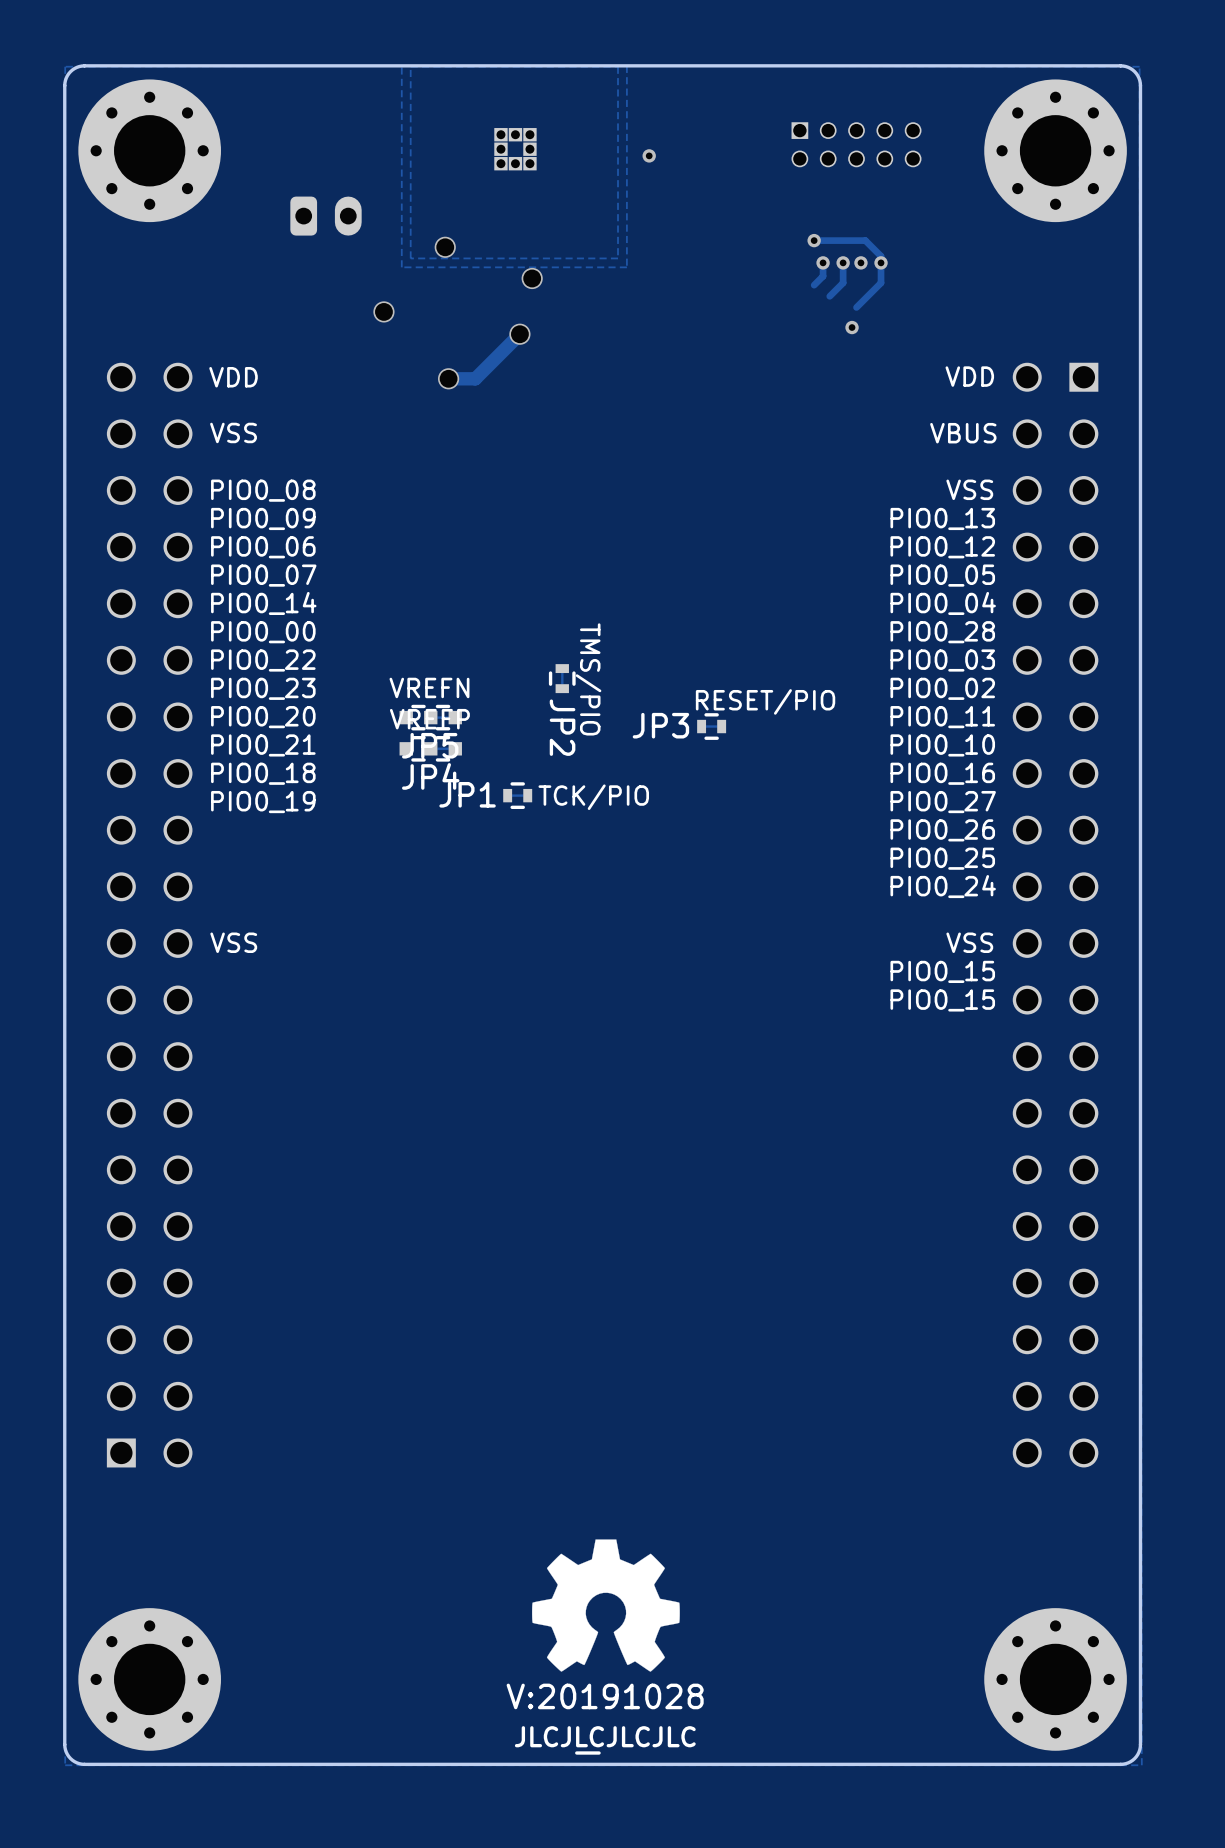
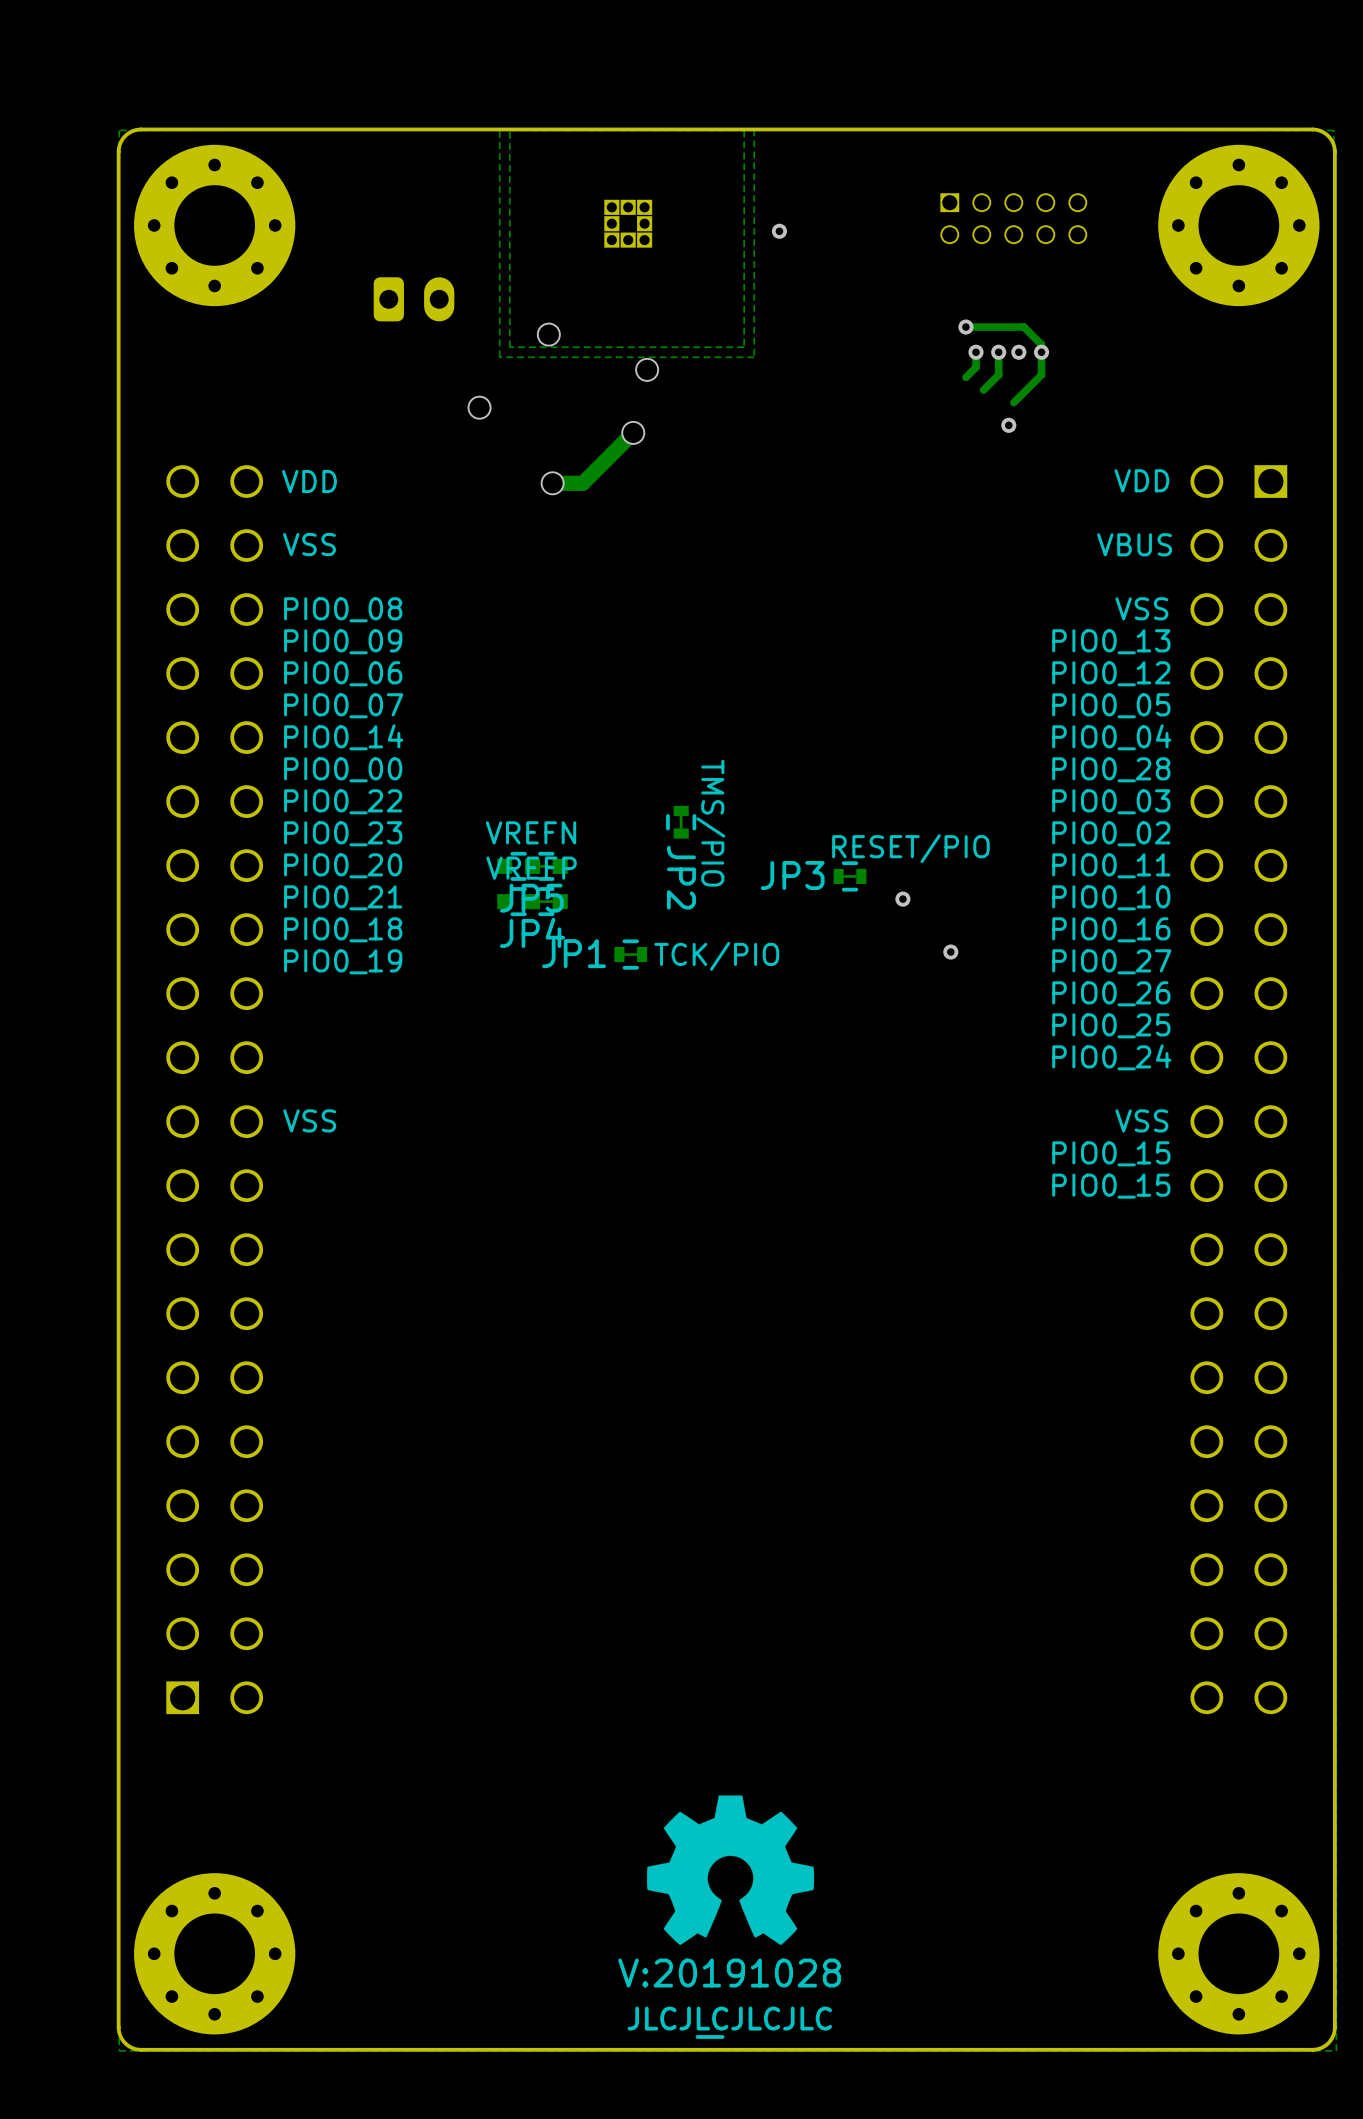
via: none -> (902, 899)
via: none -> (950, 952)

